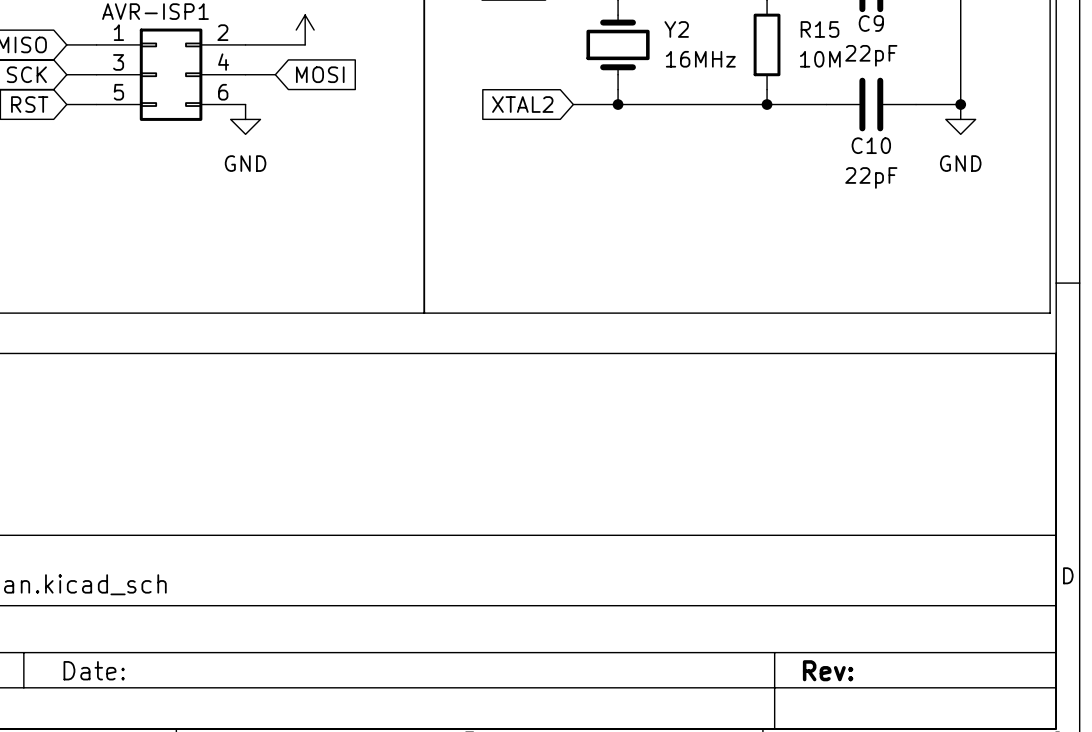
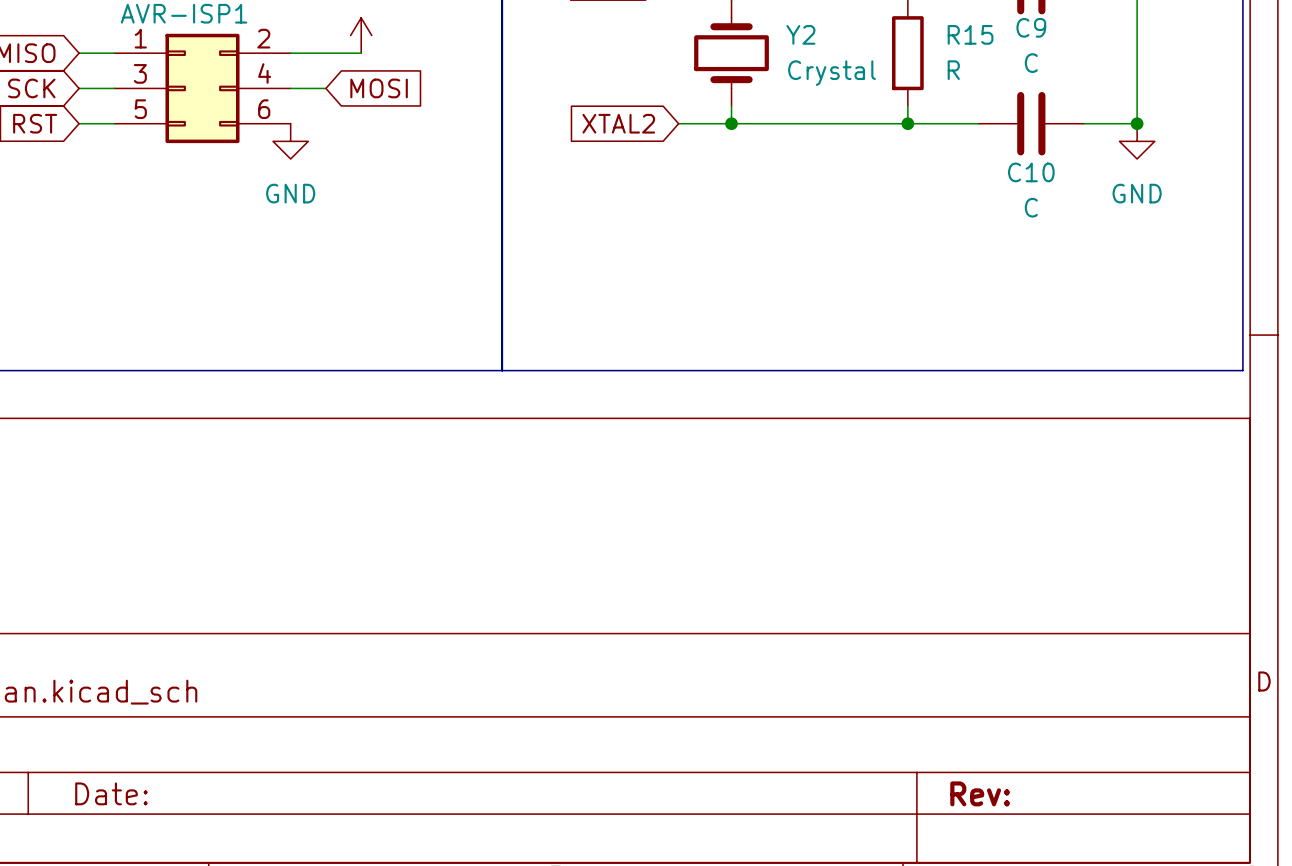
C9 value: 22pF (871, 55) -> C (1031, 63)
Y2 value: 16MHz (700, 59) -> Crystal (832, 73)
R15 value: 10M (820, 59) -> R (953, 70)
C10 value: 22pF (871, 177) -> C (1031, 207)

